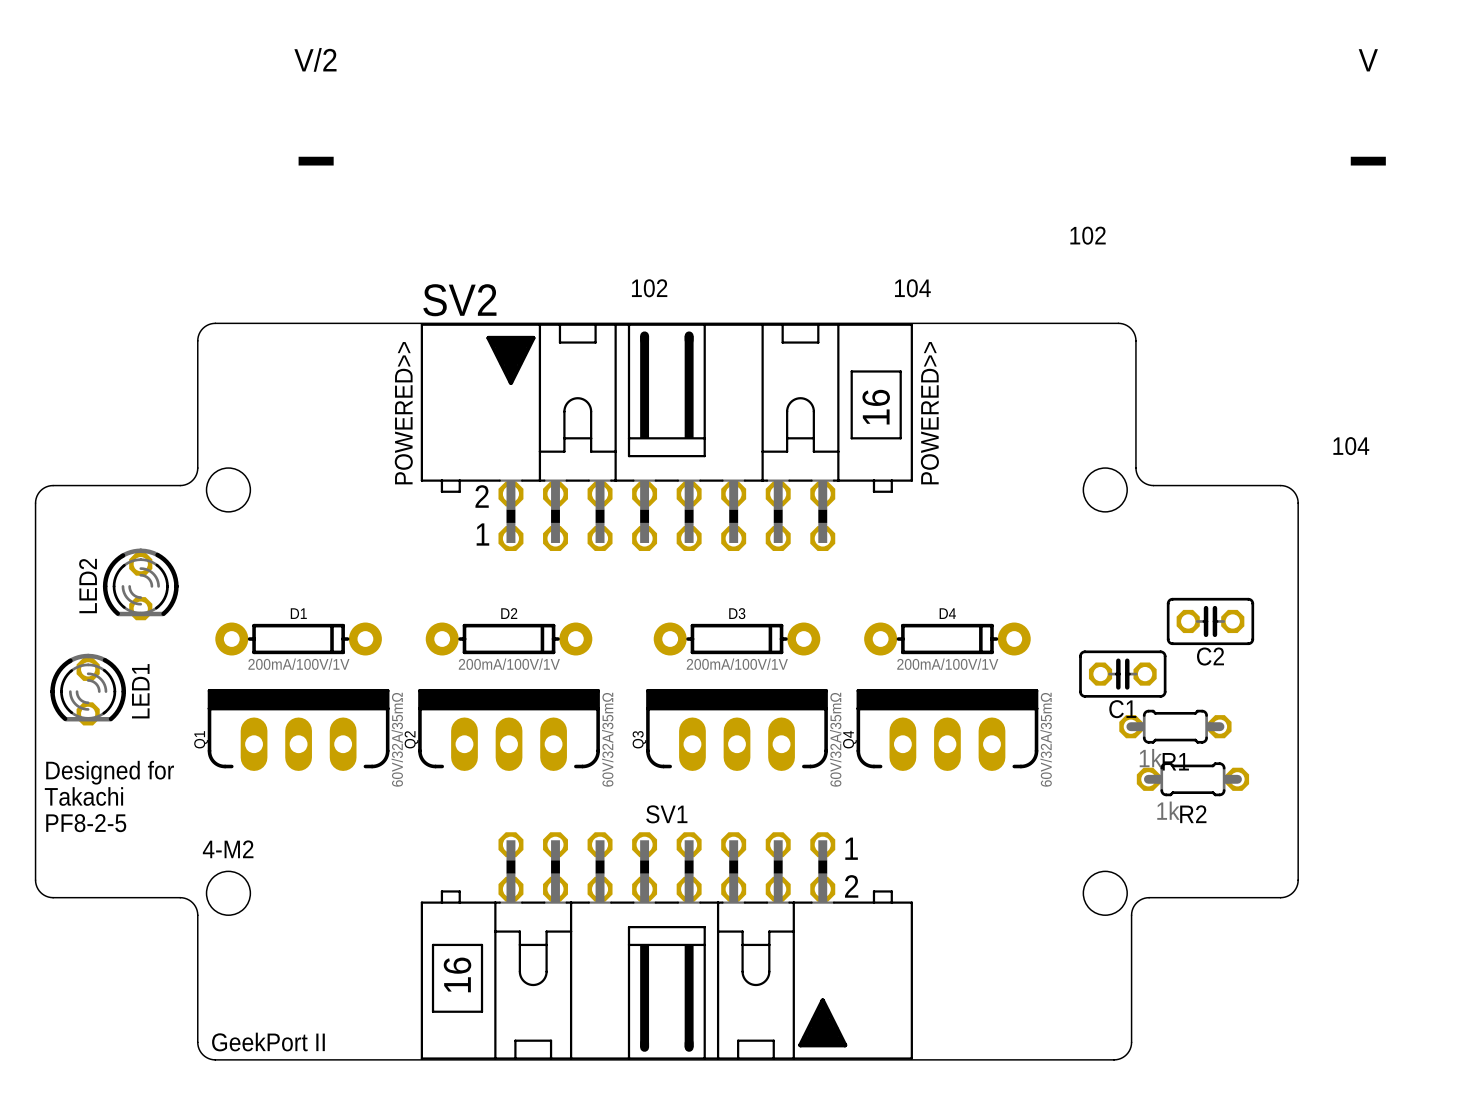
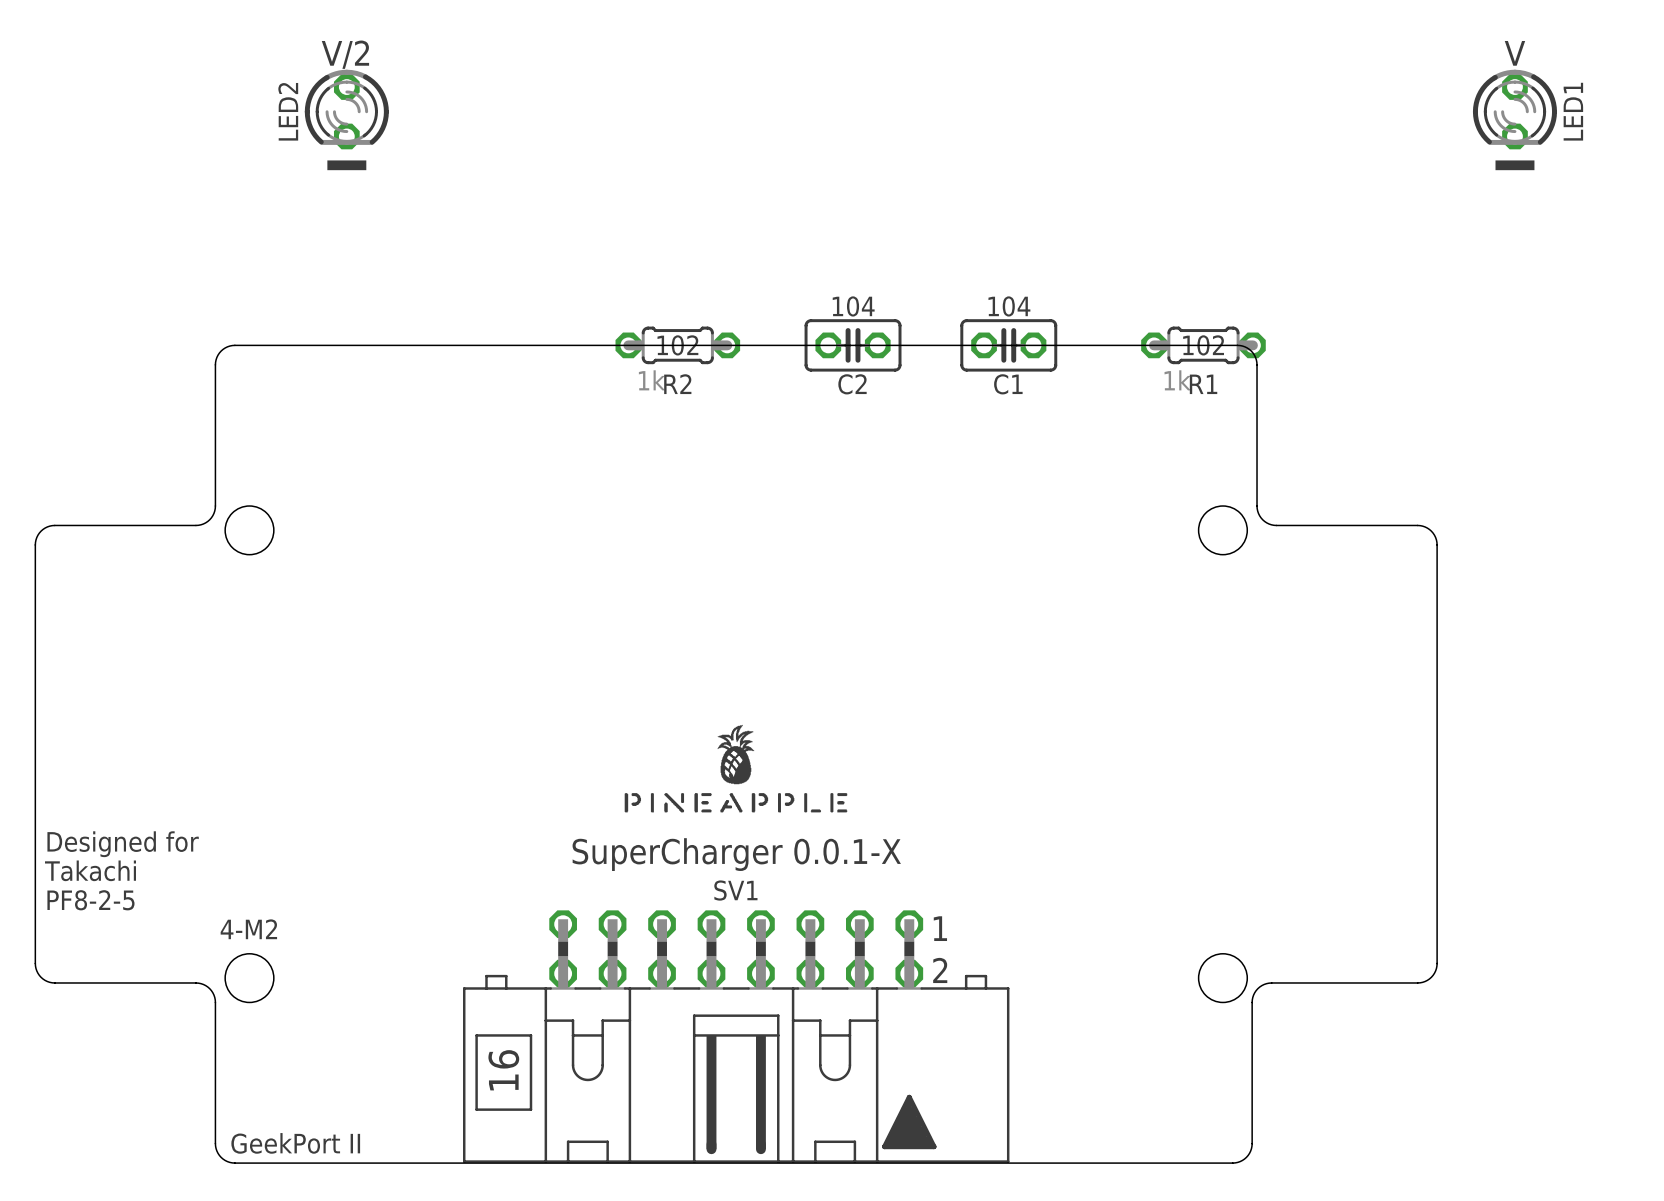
text position: 102 (1088, 235) -> 102 (1203, 345)
text position: 102 (649, 288) -> 102 (677, 345)
text: none -> 104 (853, 306)
text: POWERED>> (403, 413) -> none
text: POWERED>> (929, 413) -> none
SV2: (666, 437) -> none
text: 104 (1351, 446) -> none
LED2 position: (140, 584) -> (346, 109)
C2 position: (1210, 621) -> (853, 345)
D1: 200mA/100V/1V (298, 639) -> none
D2: 200mA/100V/1V (509, 639) -> none
D3: 200mA/100V/1V (737, 639) -> none
D4: 200mA/100V/1V (947, 639) -> none
drawing: none -> [624, 724, 848, 813]
C1 position: (1122, 674) -> (1008, 345)
LED1 position: (88, 689) -> (1514, 109)
R1 position: (1175, 726) -> (1203, 345)
Q1: 60V/32A/35mΩ (298, 729) -> none
Q2: 60V/32A/35mΩ (509, 729) -> none
Q3: 60V/32A/35mΩ (737, 729) -> none
Q4: 60V/32A/35mΩ (947, 729) -> none
R2 position: (1192, 779) -> (677, 345)
text: none -> SuperCharger 0.0.1-X (736, 854)

